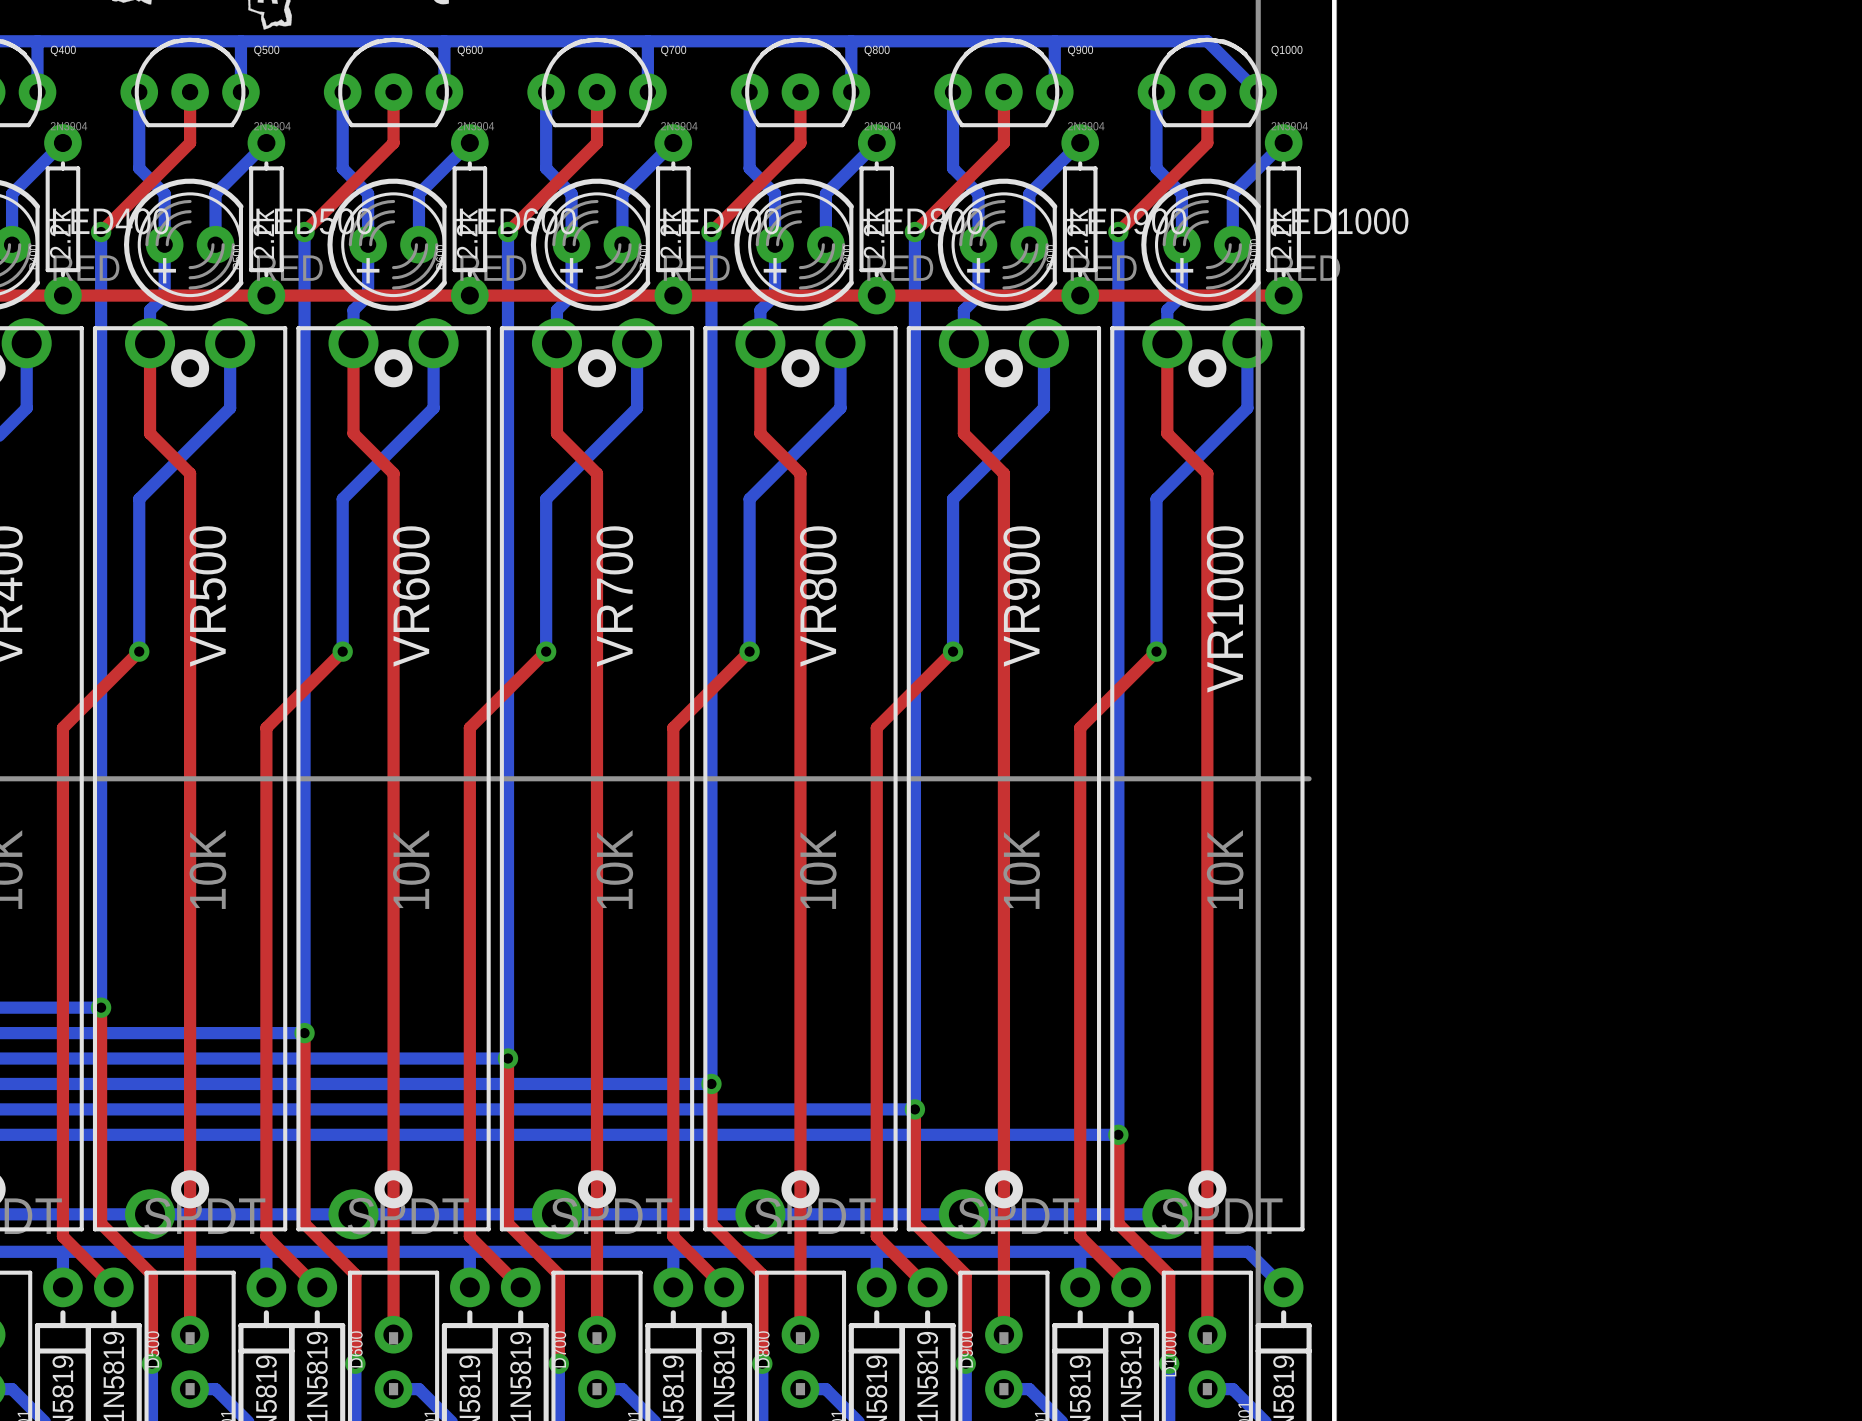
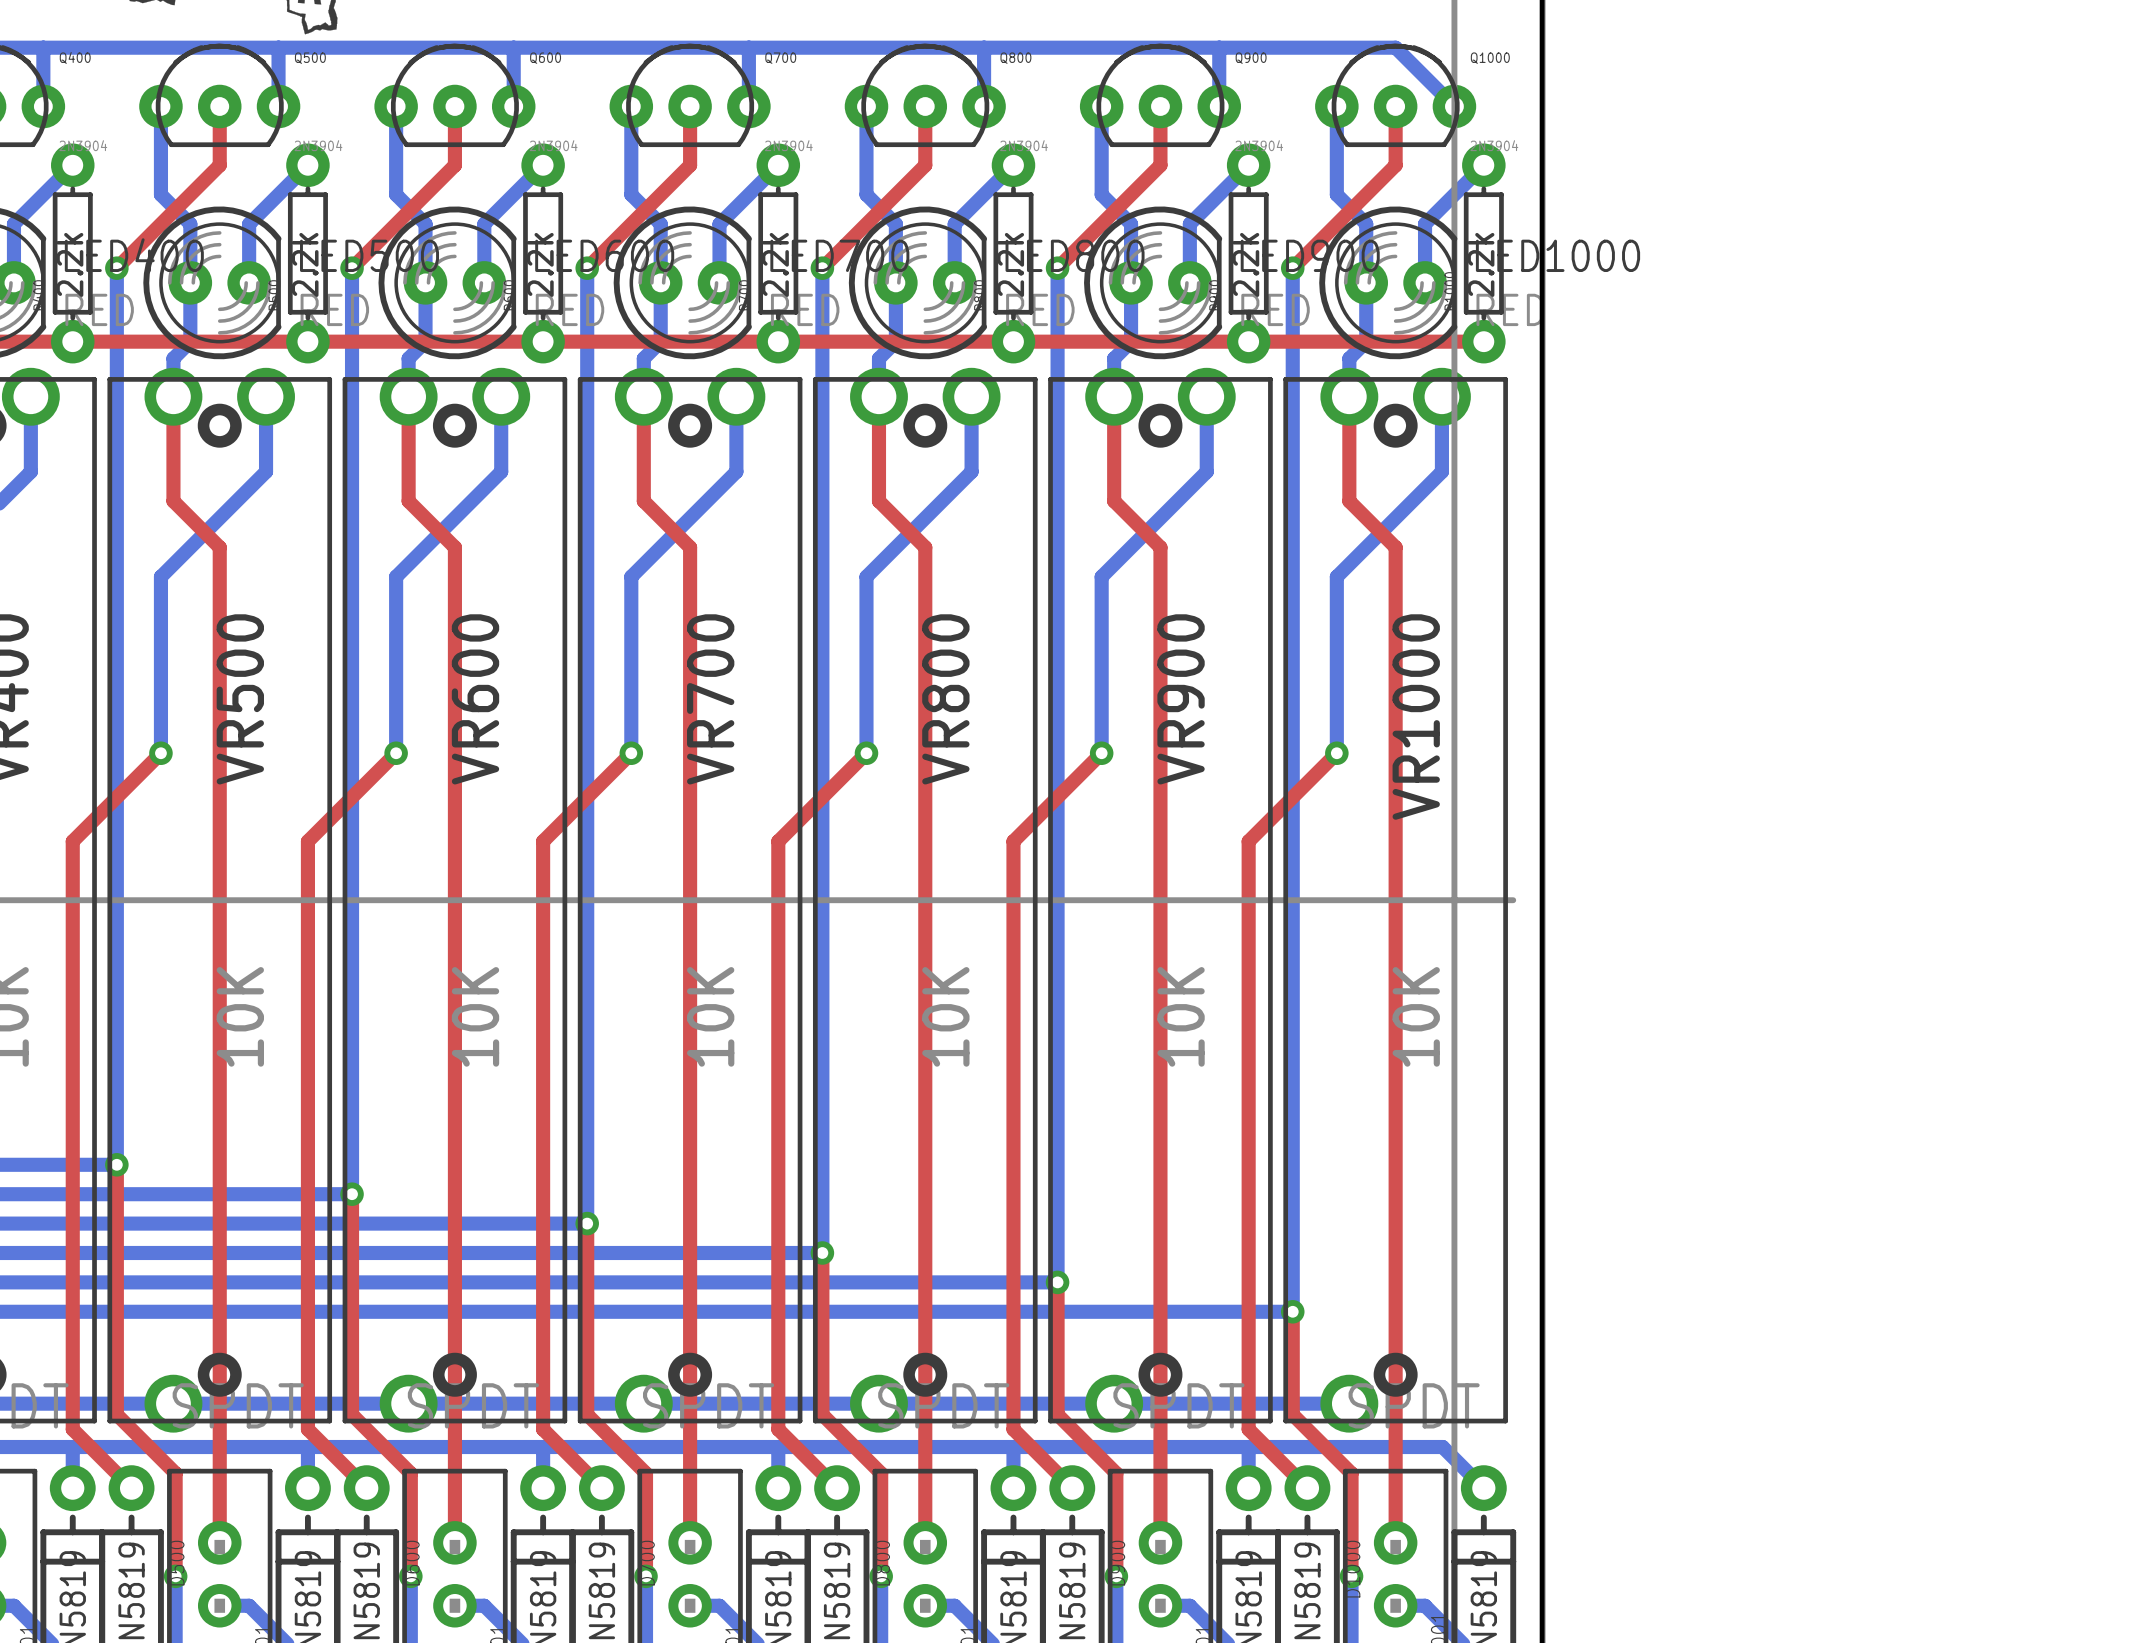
text: + (164, 270) -> none
text: + (368, 270) -> none
text: + (571, 270) -> none
text: + (775, 270) -> none
text: + (978, 270) -> none
text: + (1181, 270) -> none

